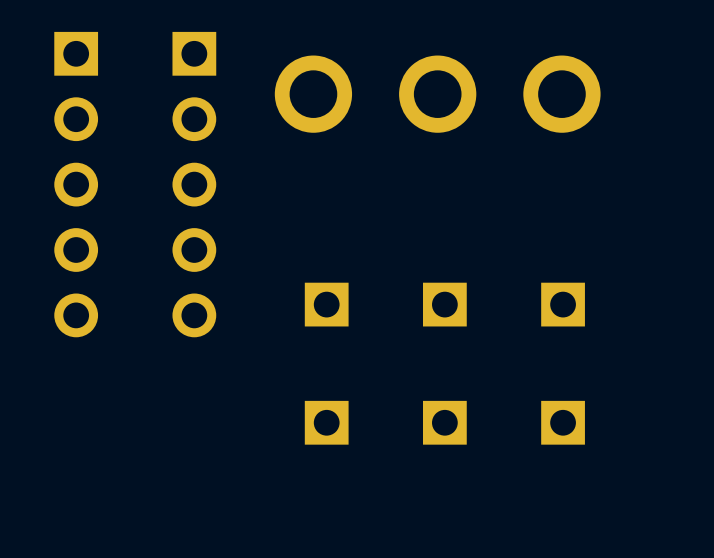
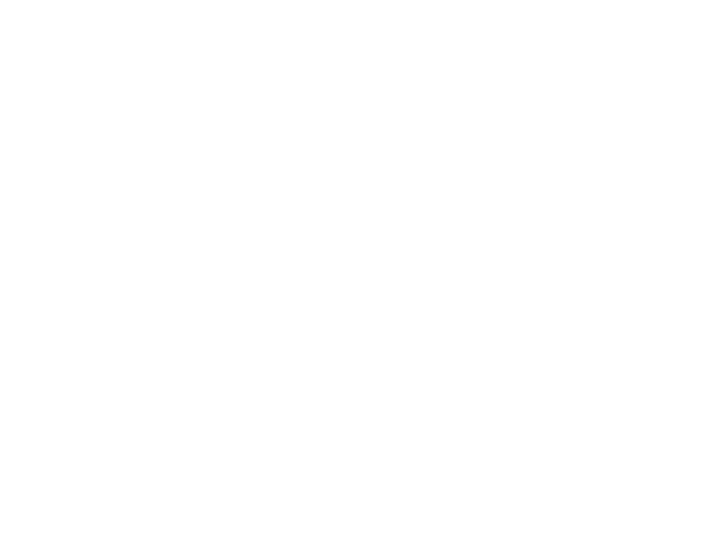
part: (437, 94) -> none
part: (76, 184) -> none
part: (194, 184) -> none
part: (326, 304) -> none
part: (444, 304) -> none
part: (563, 304) -> none
part: (326, 422) -> none
part: (444, 422) -> none
part: (563, 422) -> none

